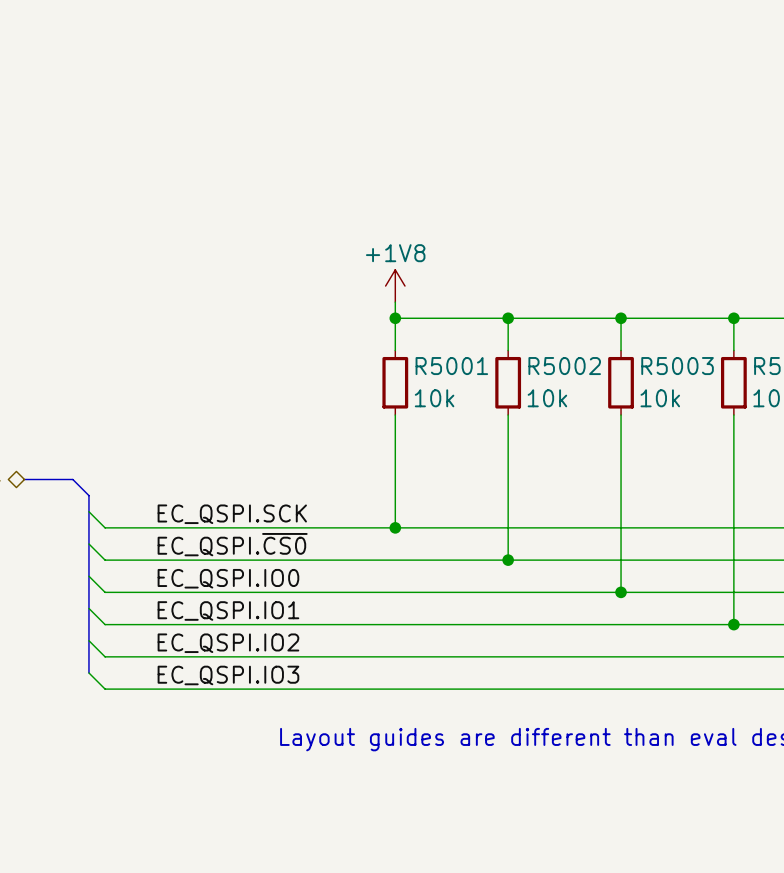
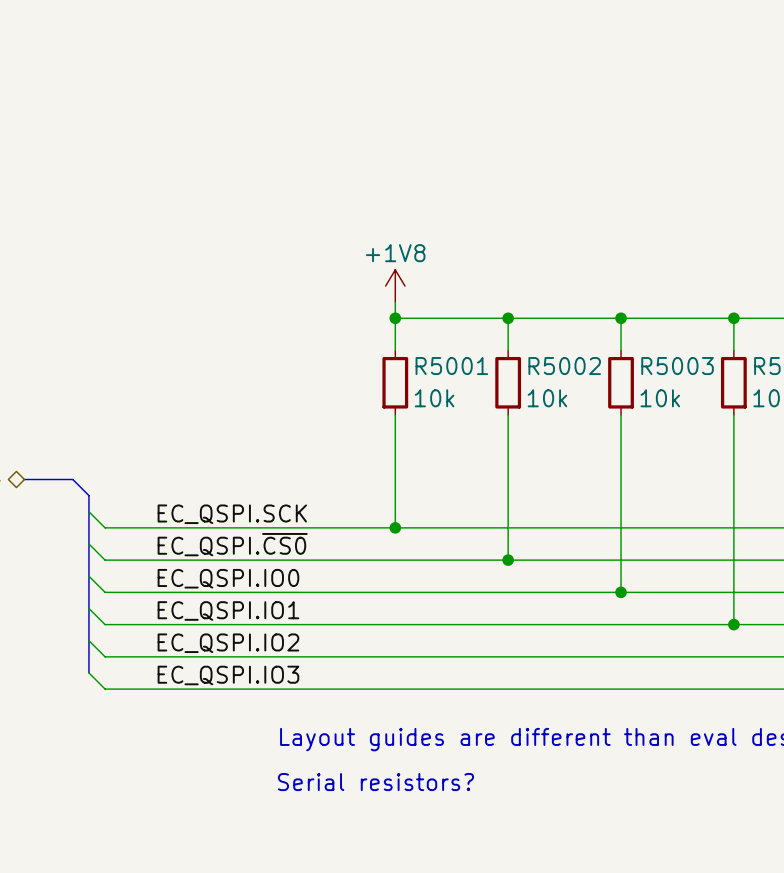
text: none -> Serial resistors? (375, 782)

